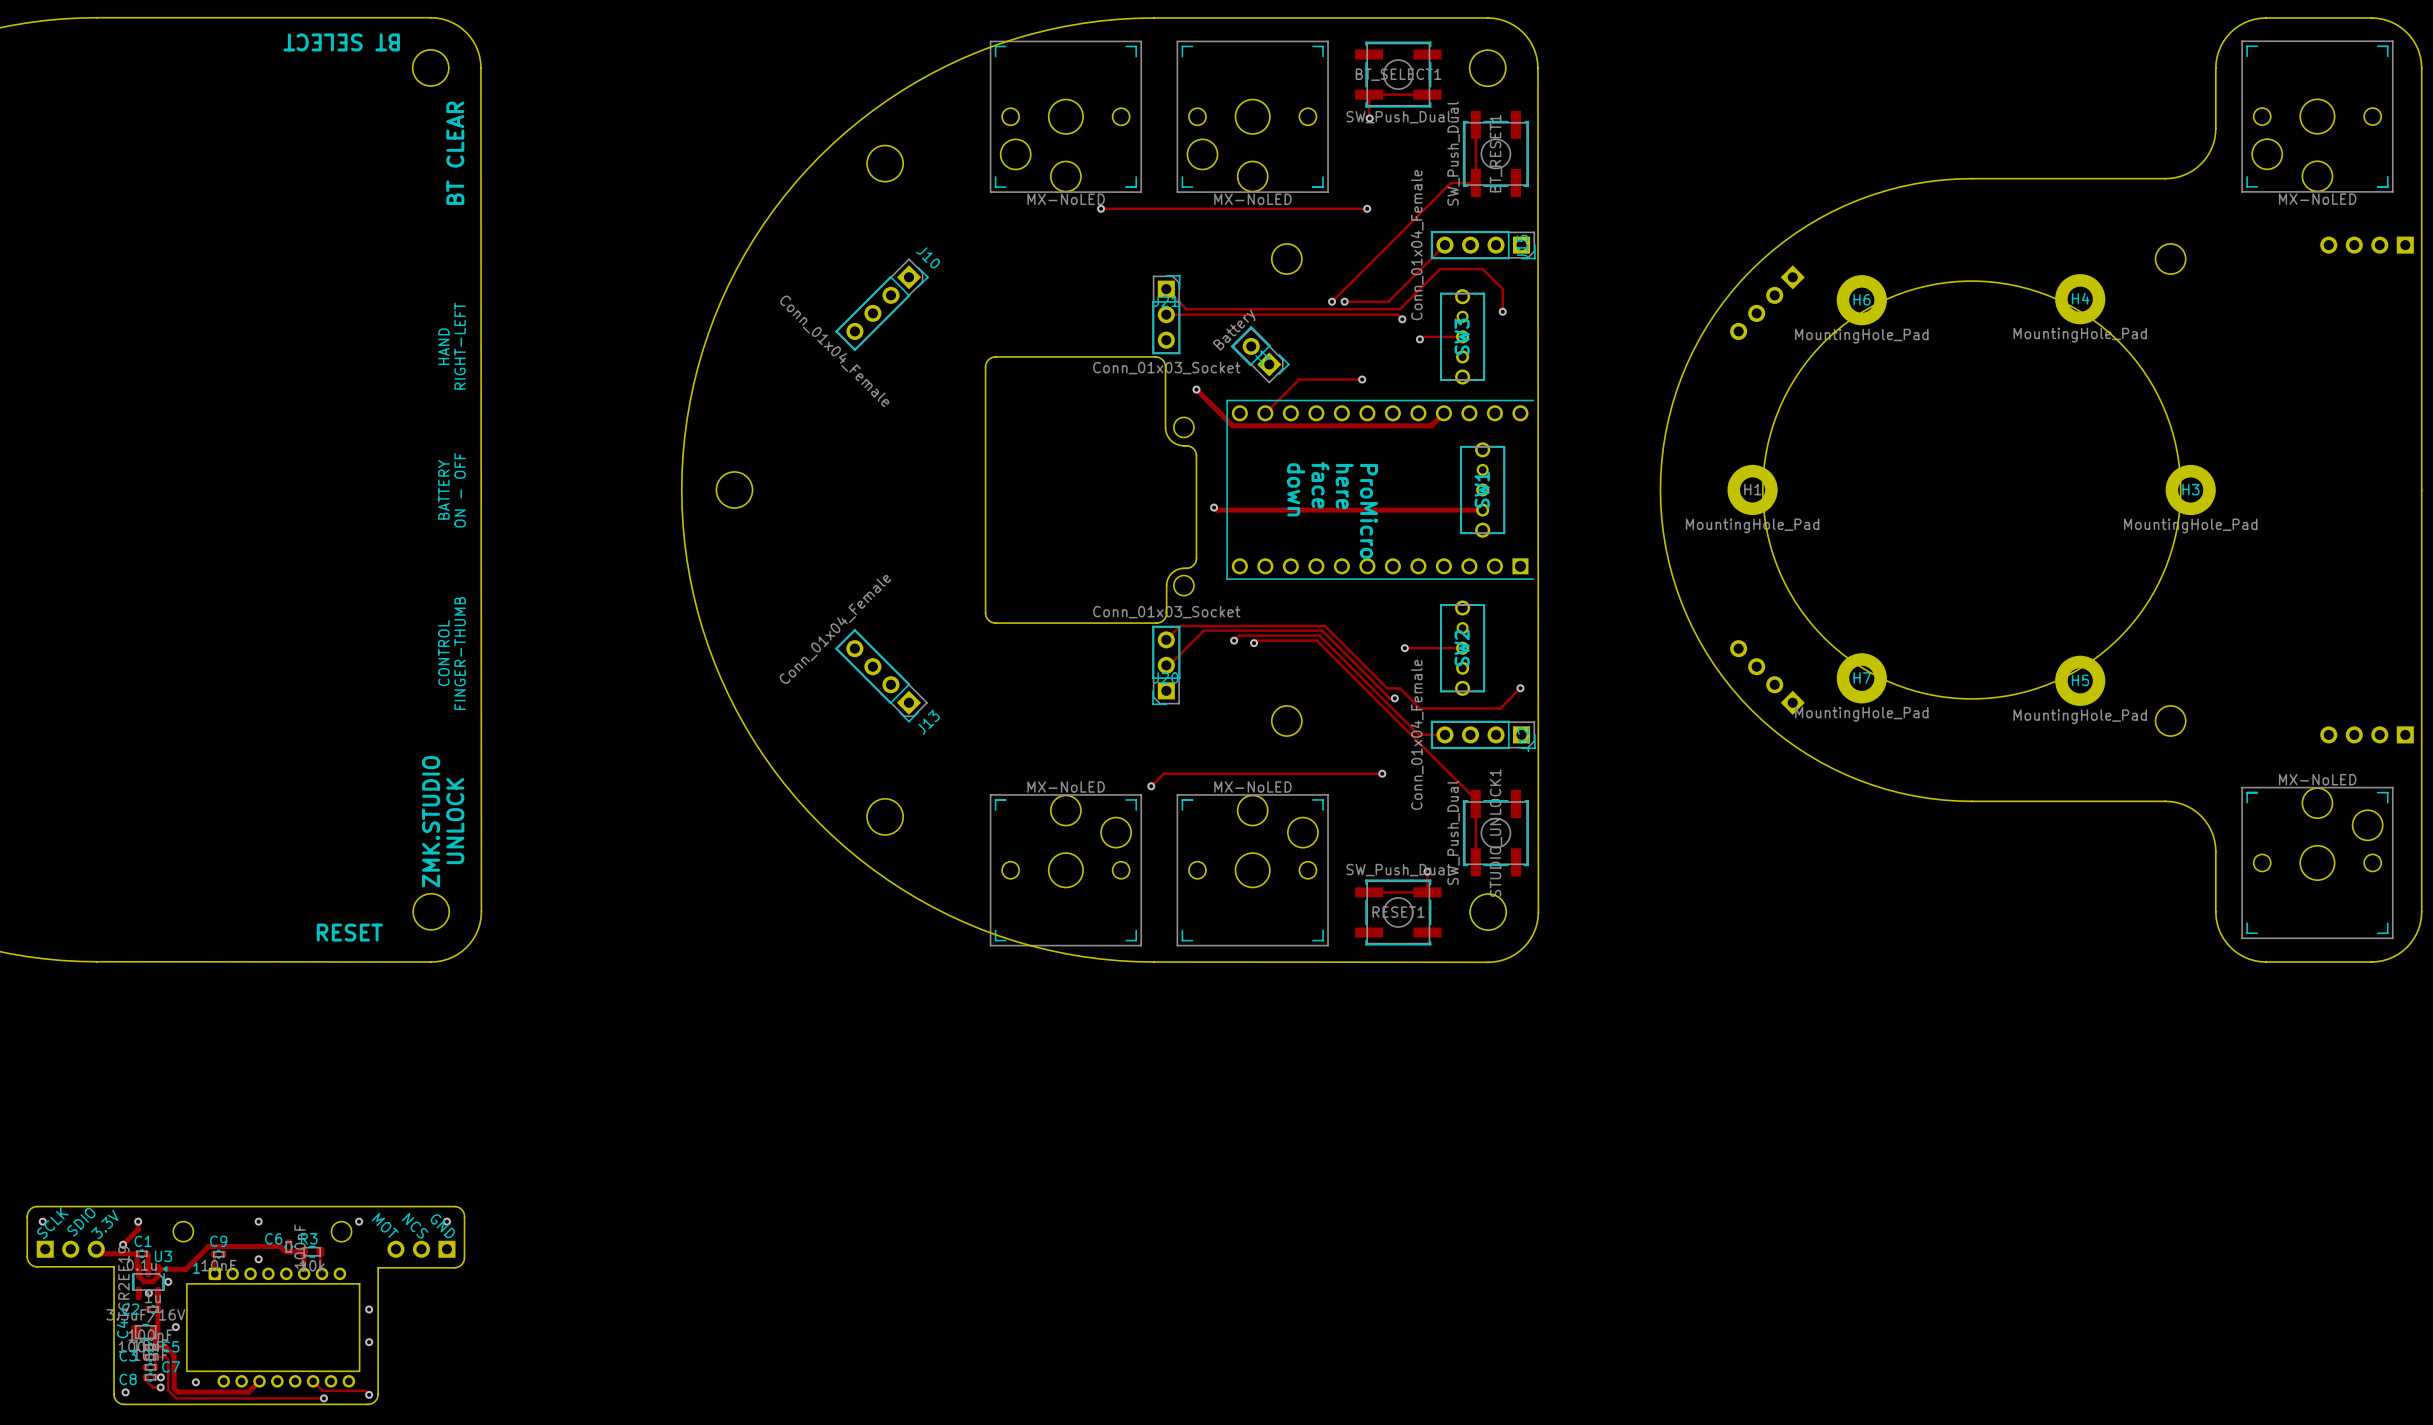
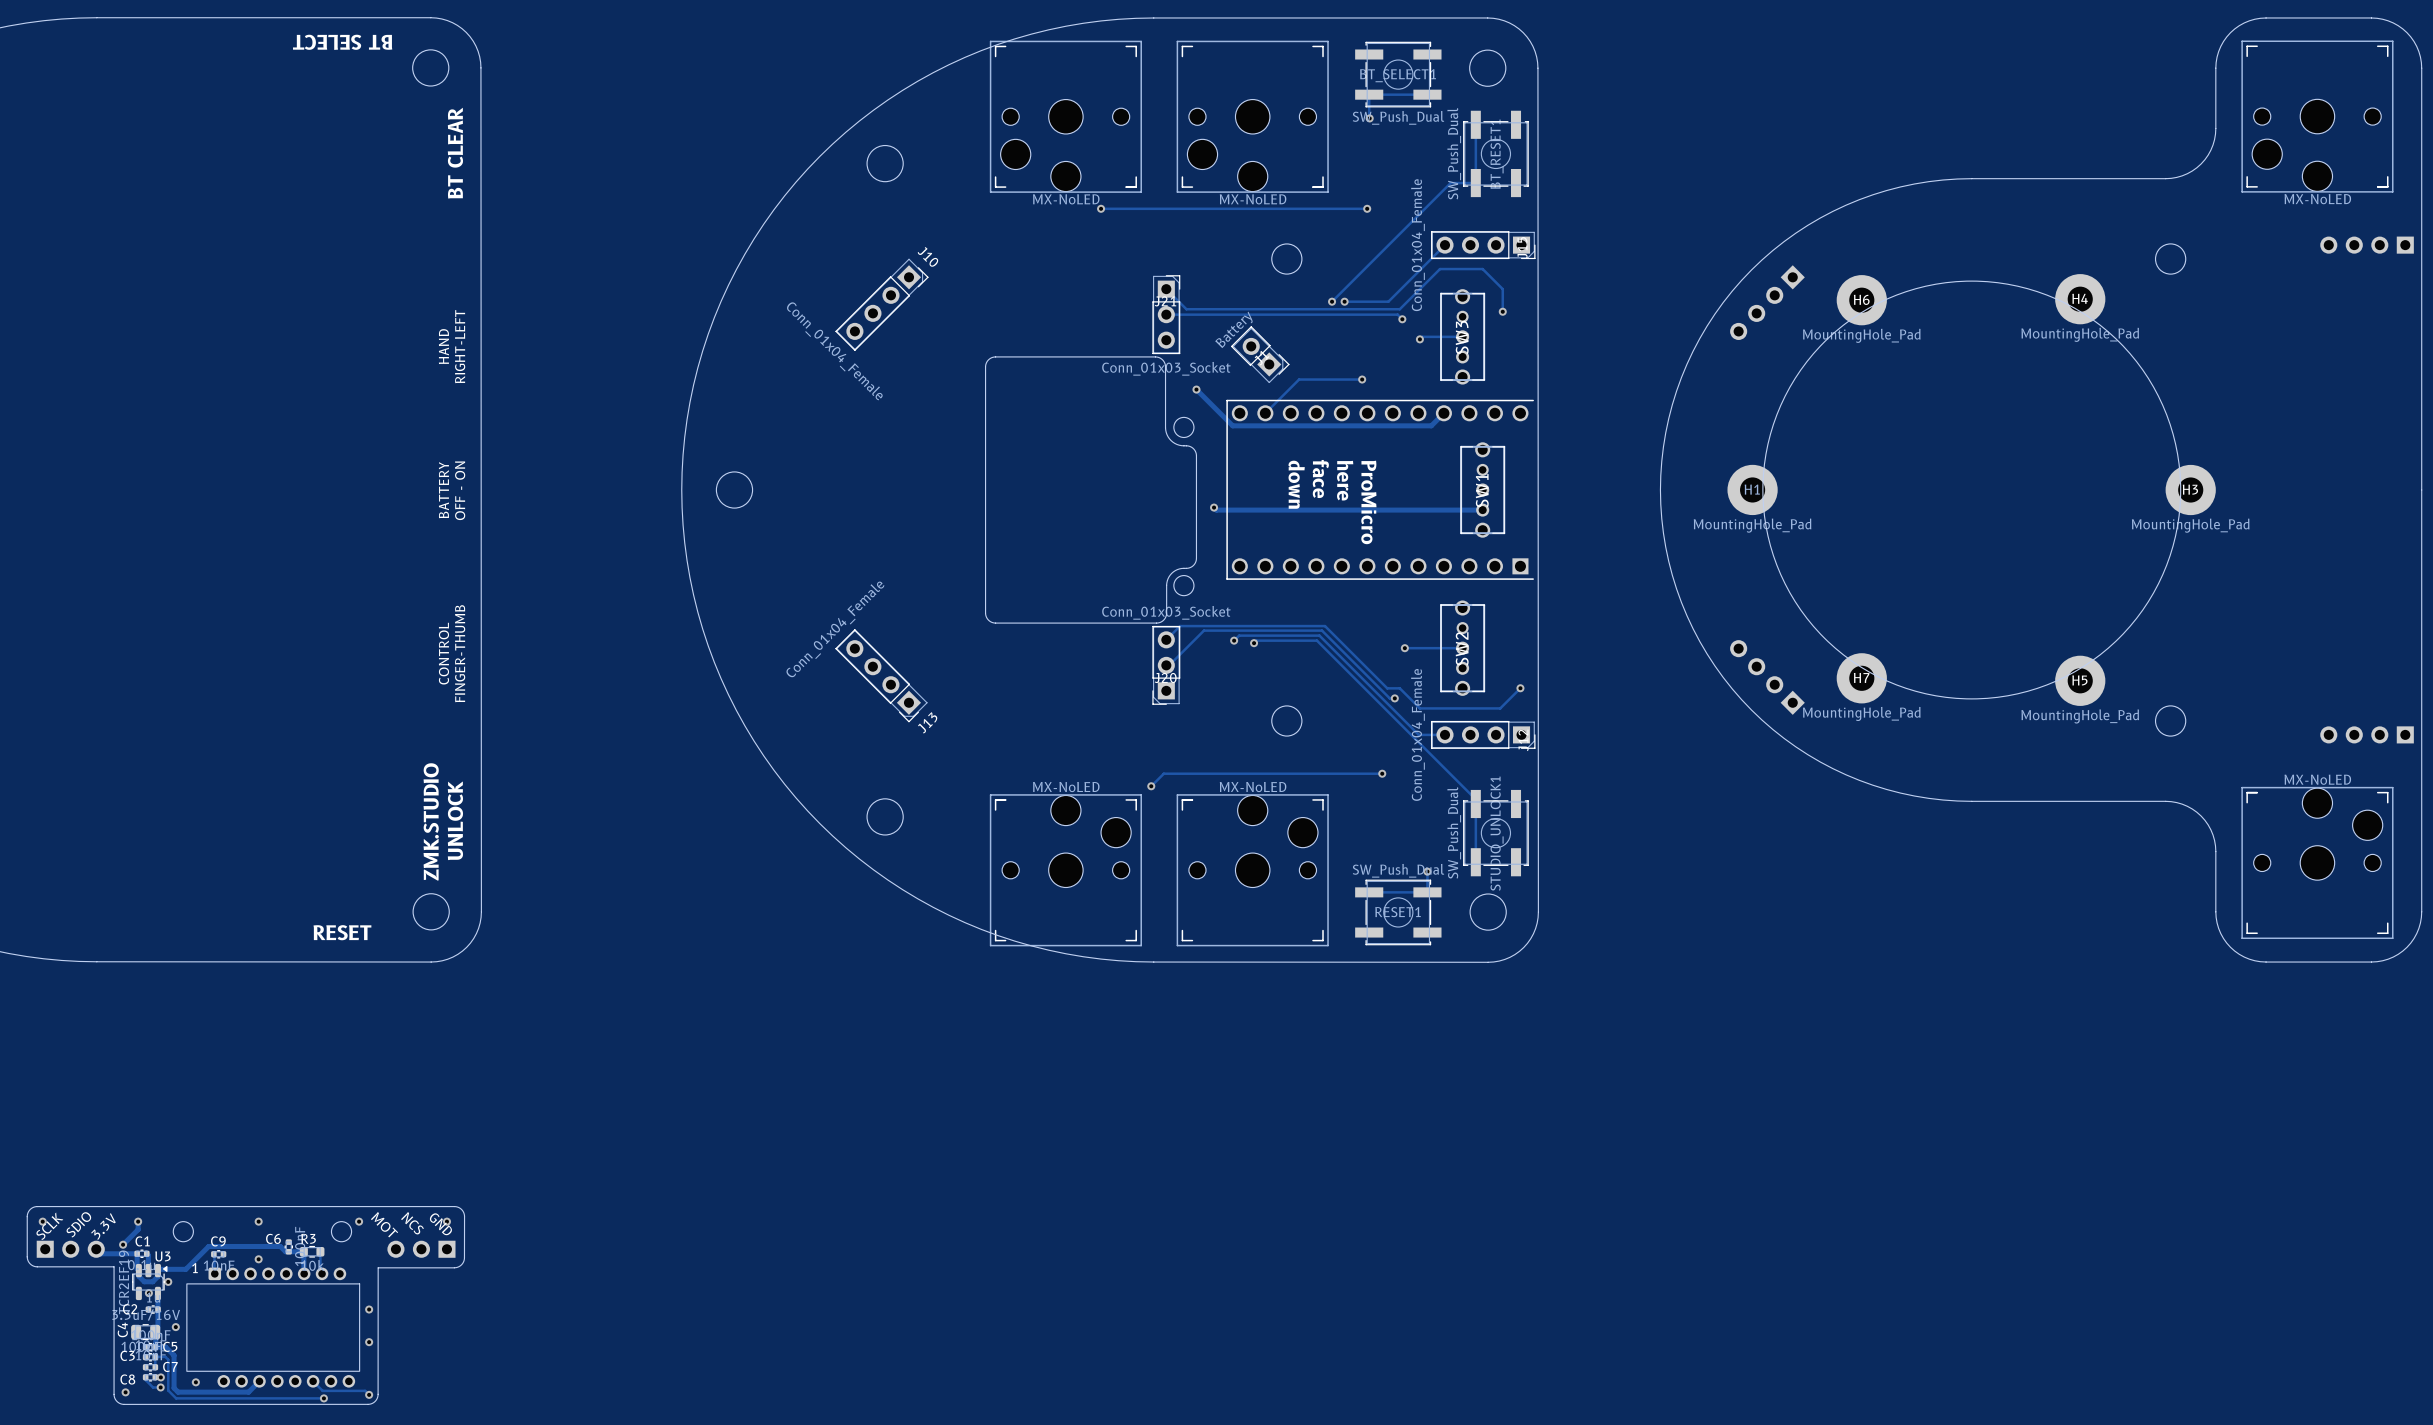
text: ON - OFF (460, 490) -> OFF - ON (460, 490)

